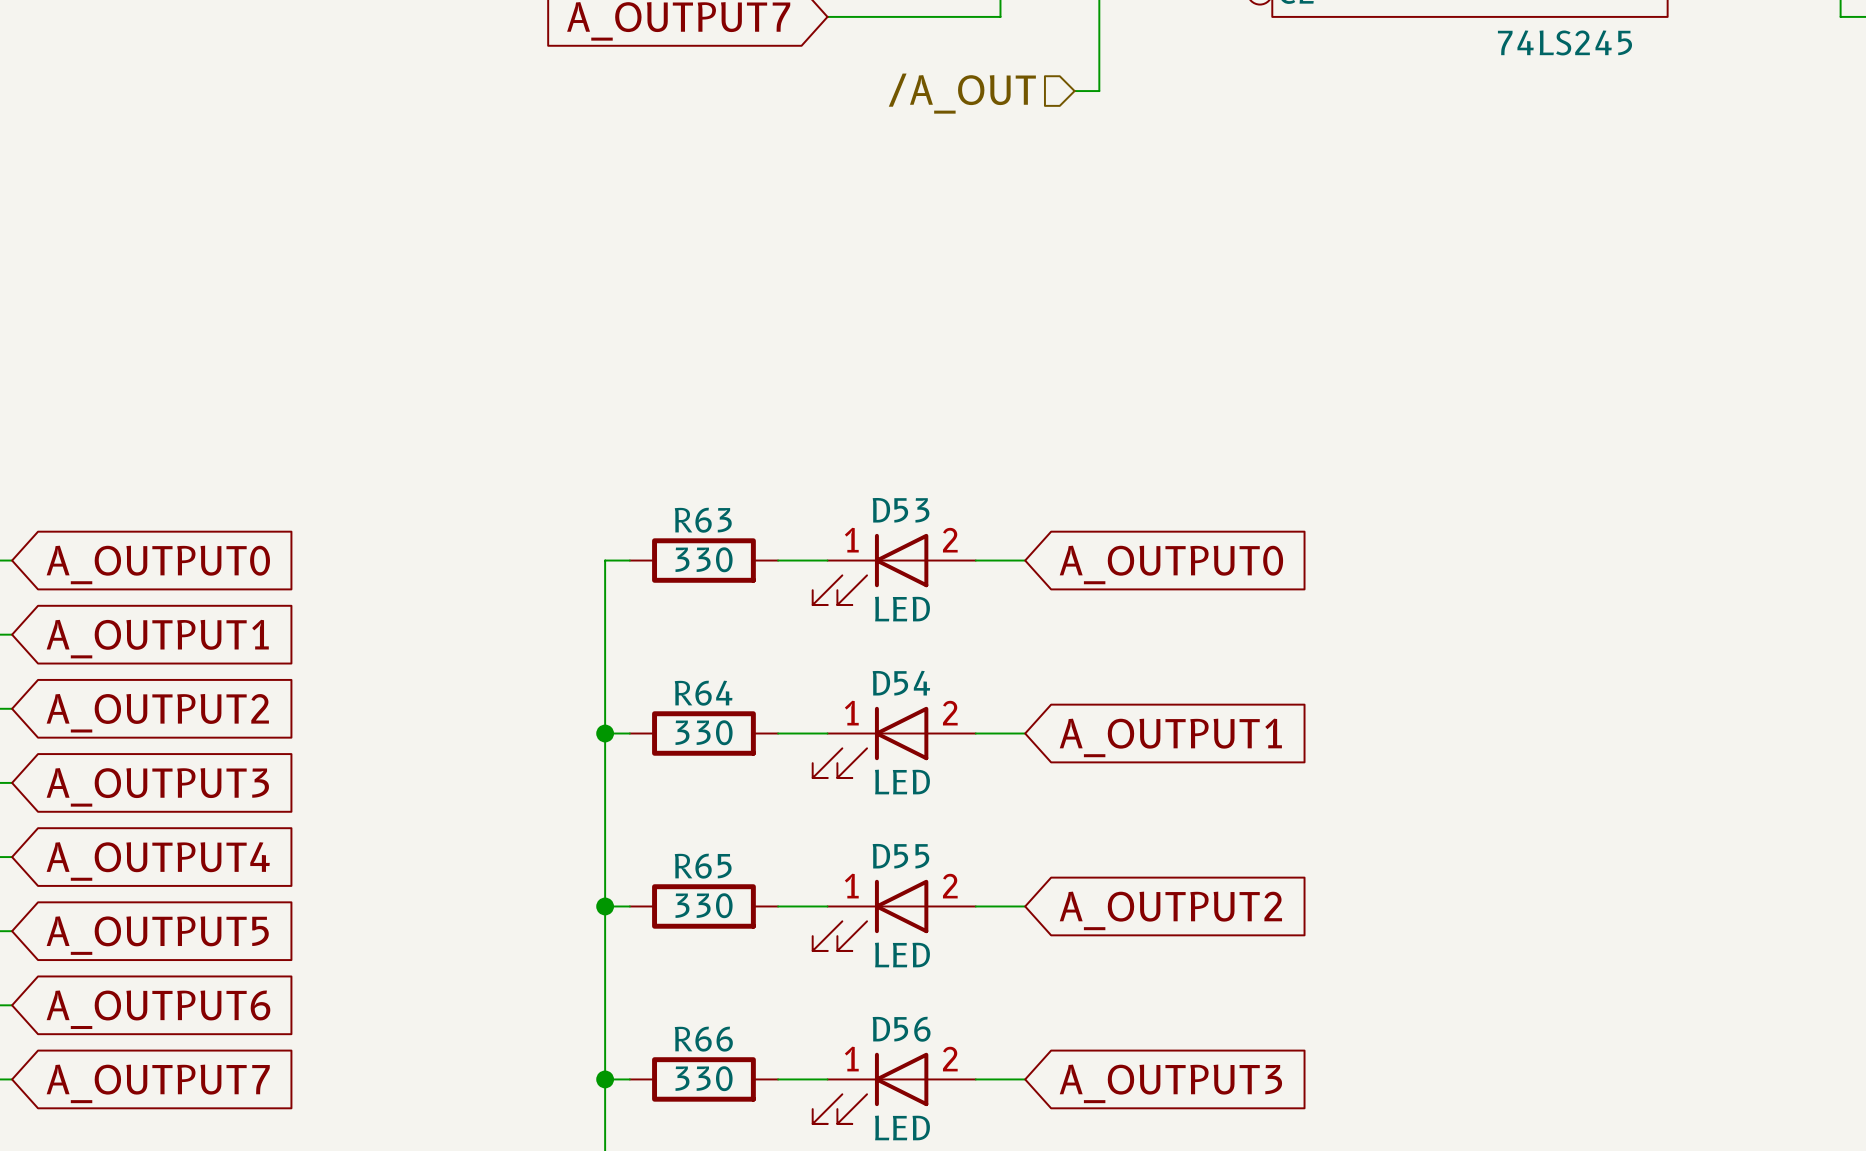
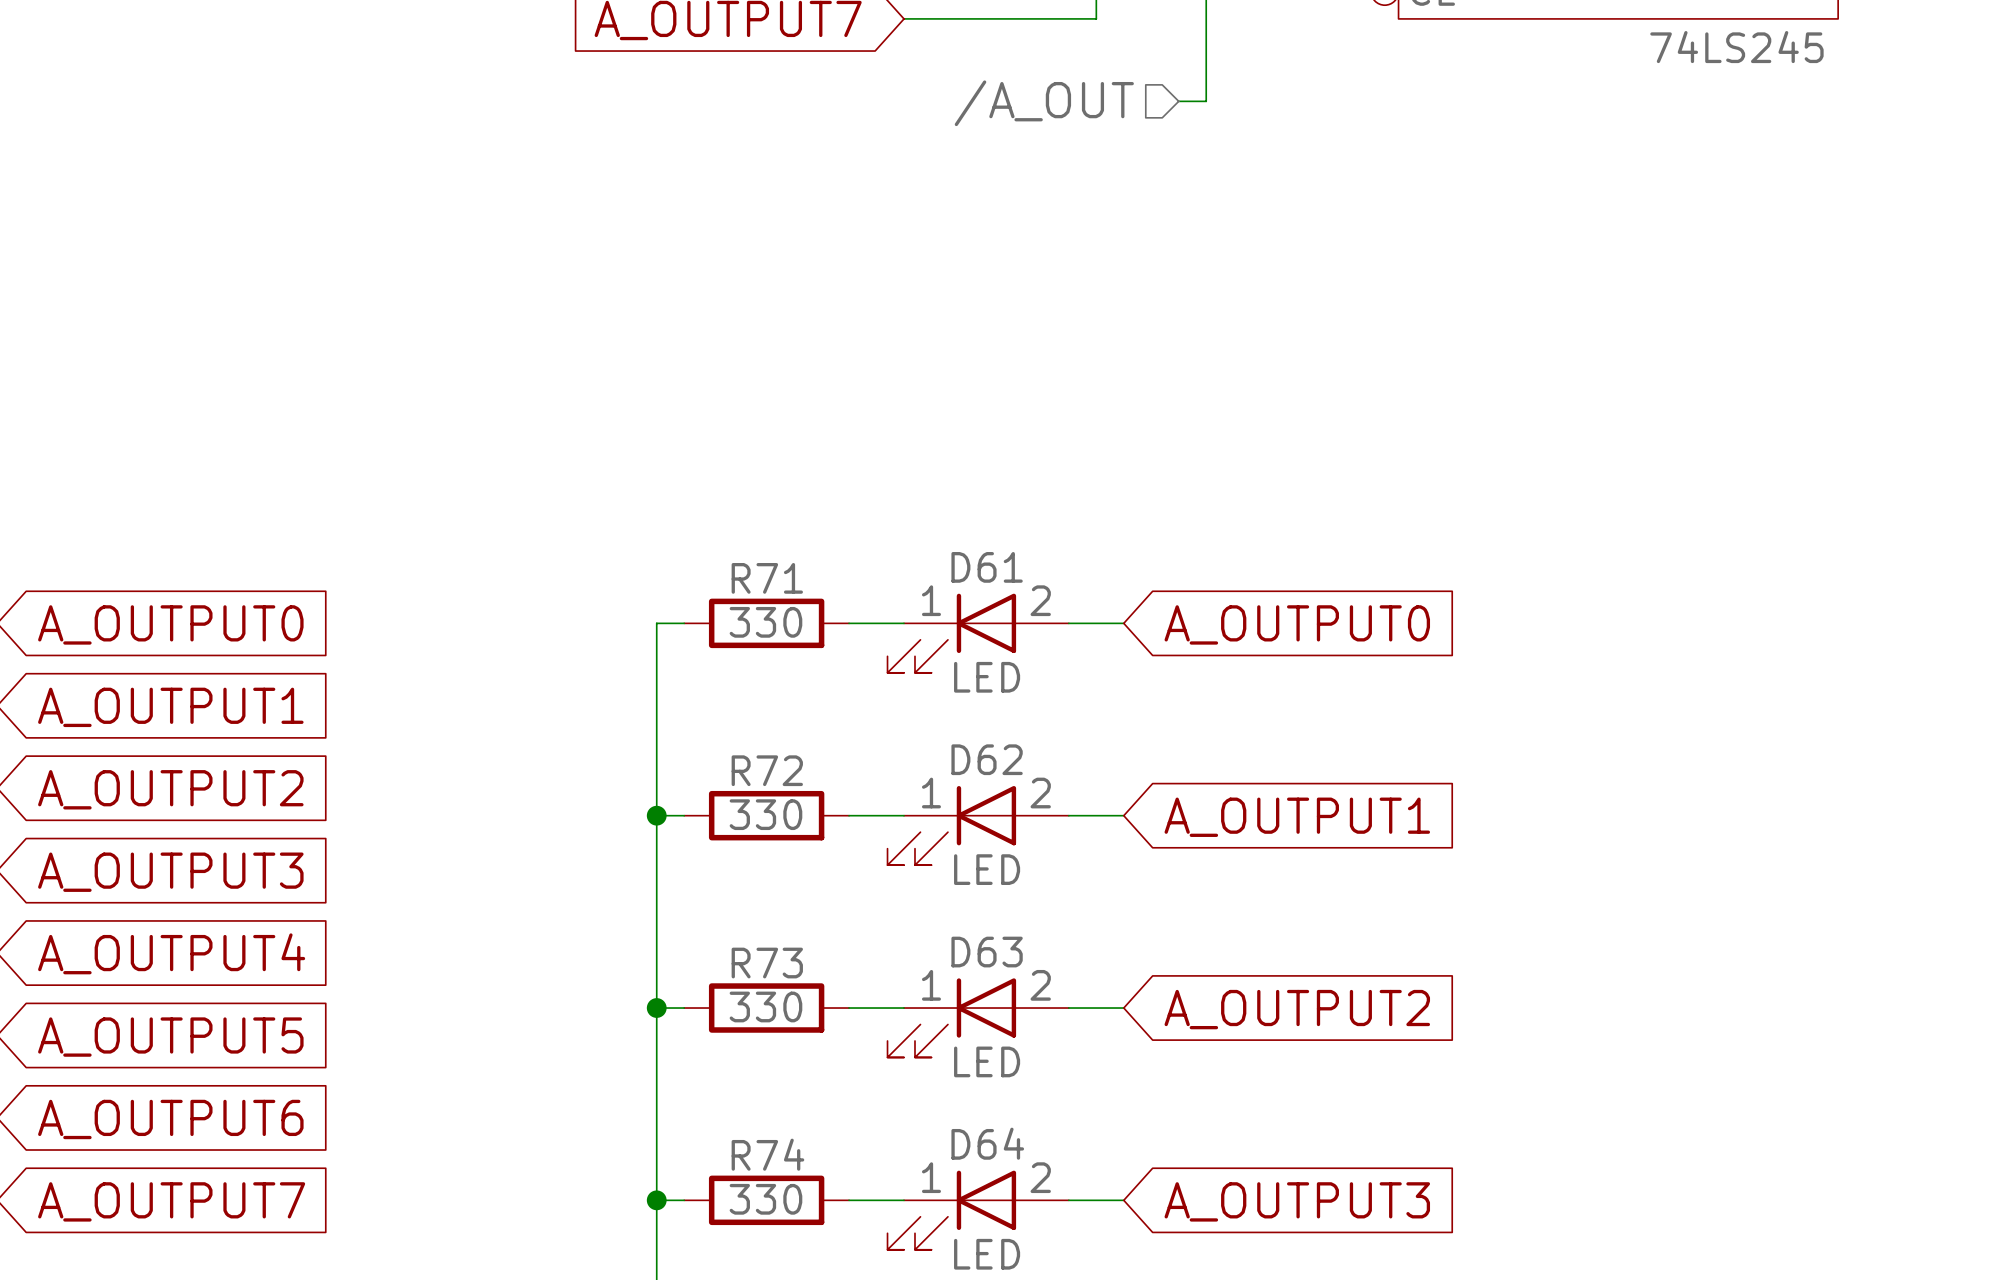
D53 name: D53 (901, 510) -> D61 (987, 567)
R63 name: R63 (703, 520) -> R71 (767, 578)
D54 name: D54 (901, 683) -> D62 (987, 759)
R64 name: R64 (703, 693) -> R72 (767, 770)
D55 name: D55 (900, 856) -> D63 (987, 952)
R65 name: R65 (703, 866) -> R73 (767, 963)
D56 name: D56 (901, 1029) -> D64 (987, 1143)
R66 name: R66 (703, 1039) -> R74 (767, 1154)

